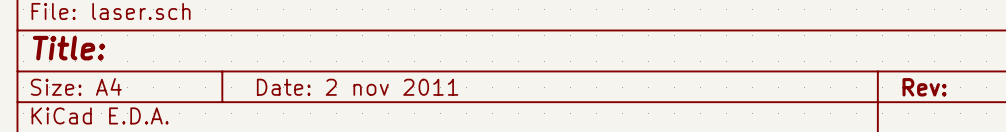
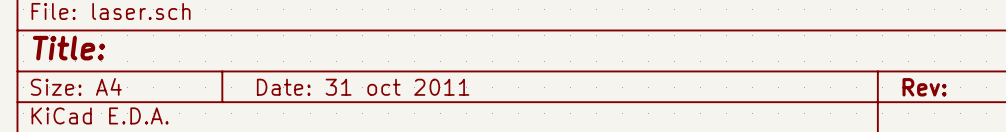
title block: Date: 2 nov 2011 (357, 87) -> Date: 31 oct 2011 (363, 87)

